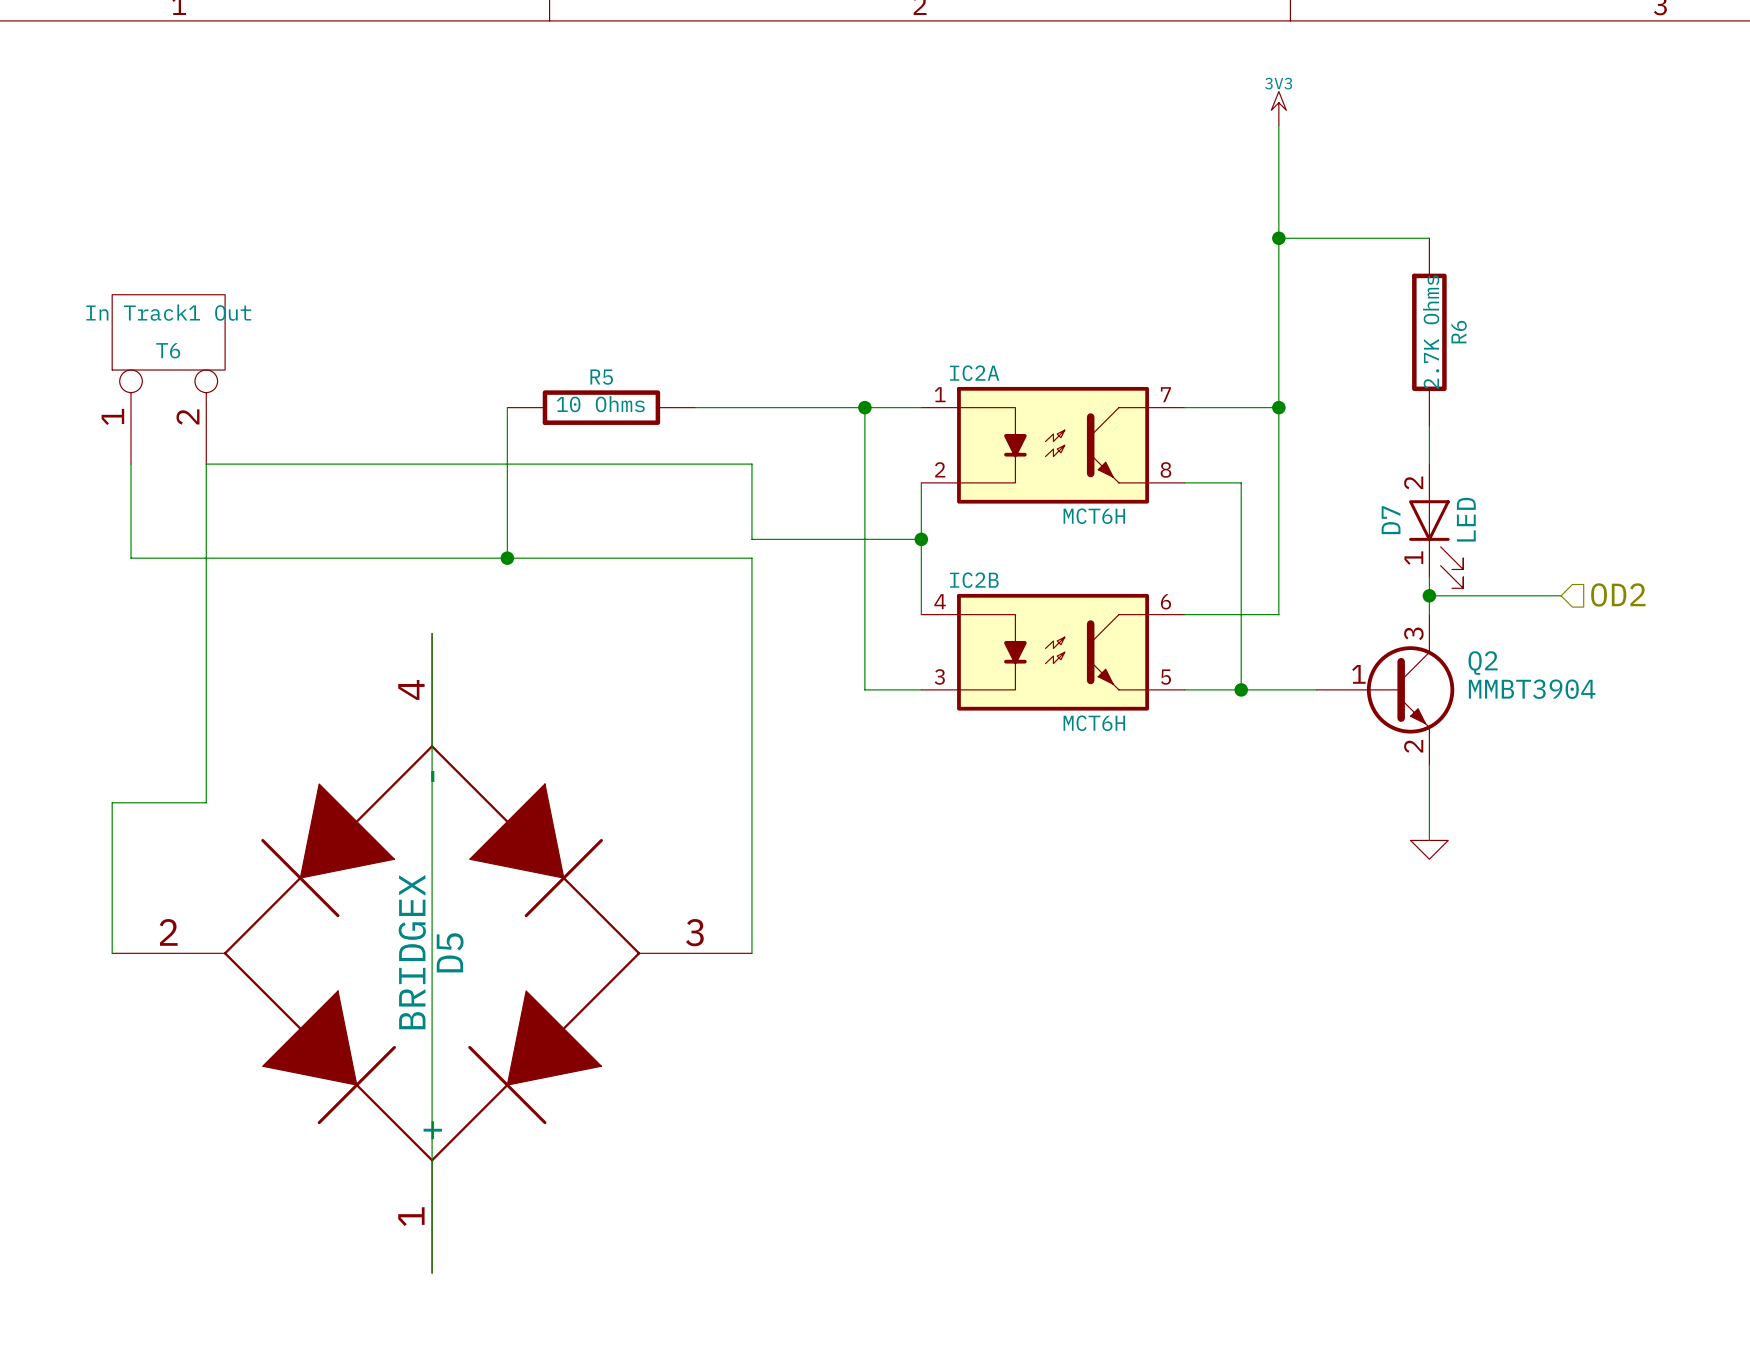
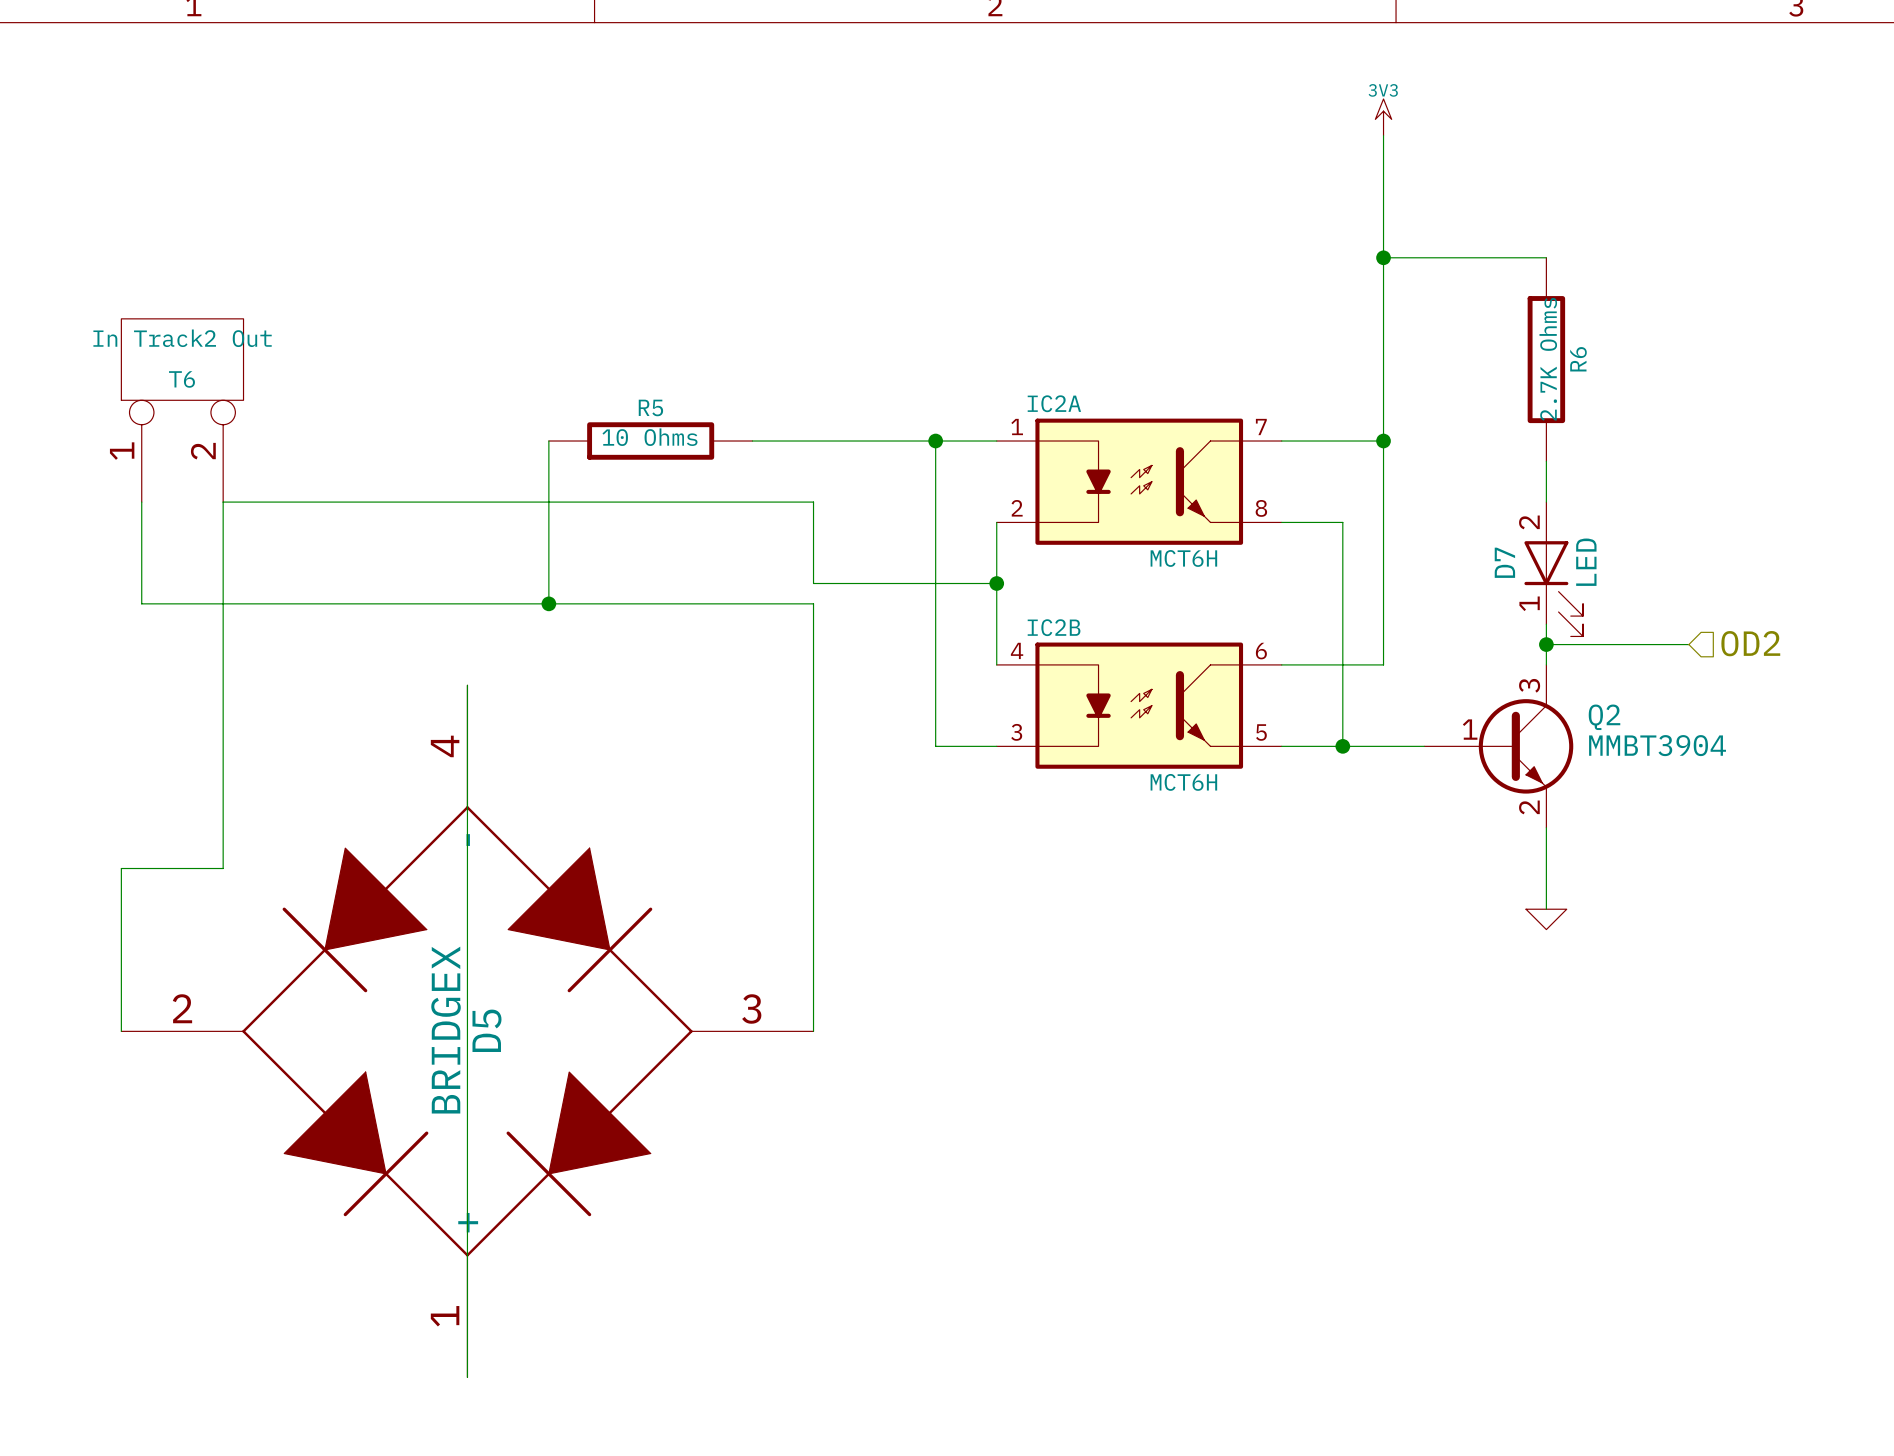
T6 value: In Track1 Out (168, 312) -> In Track2 Out (182, 338)

